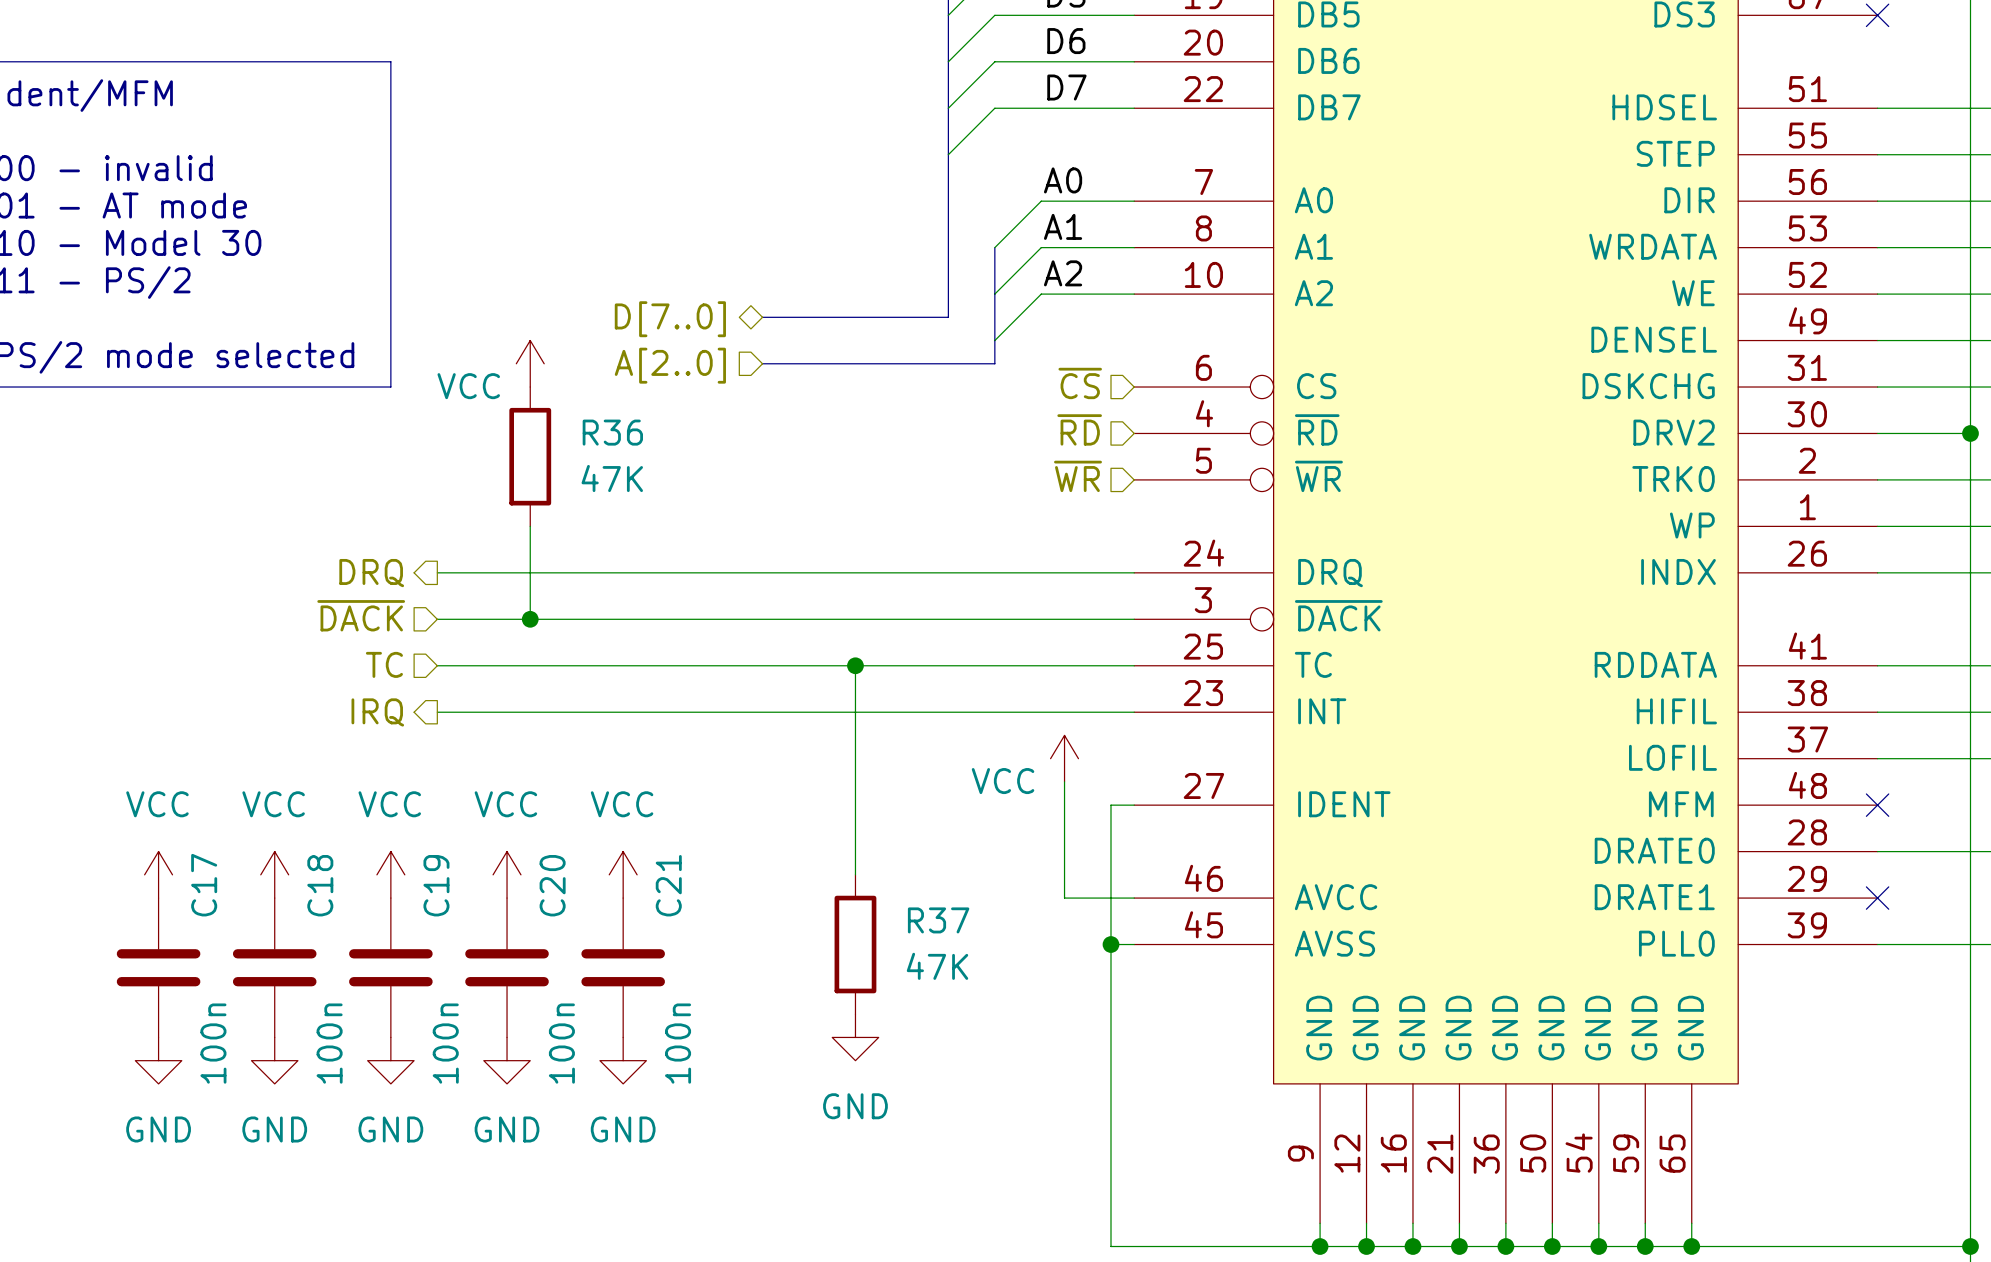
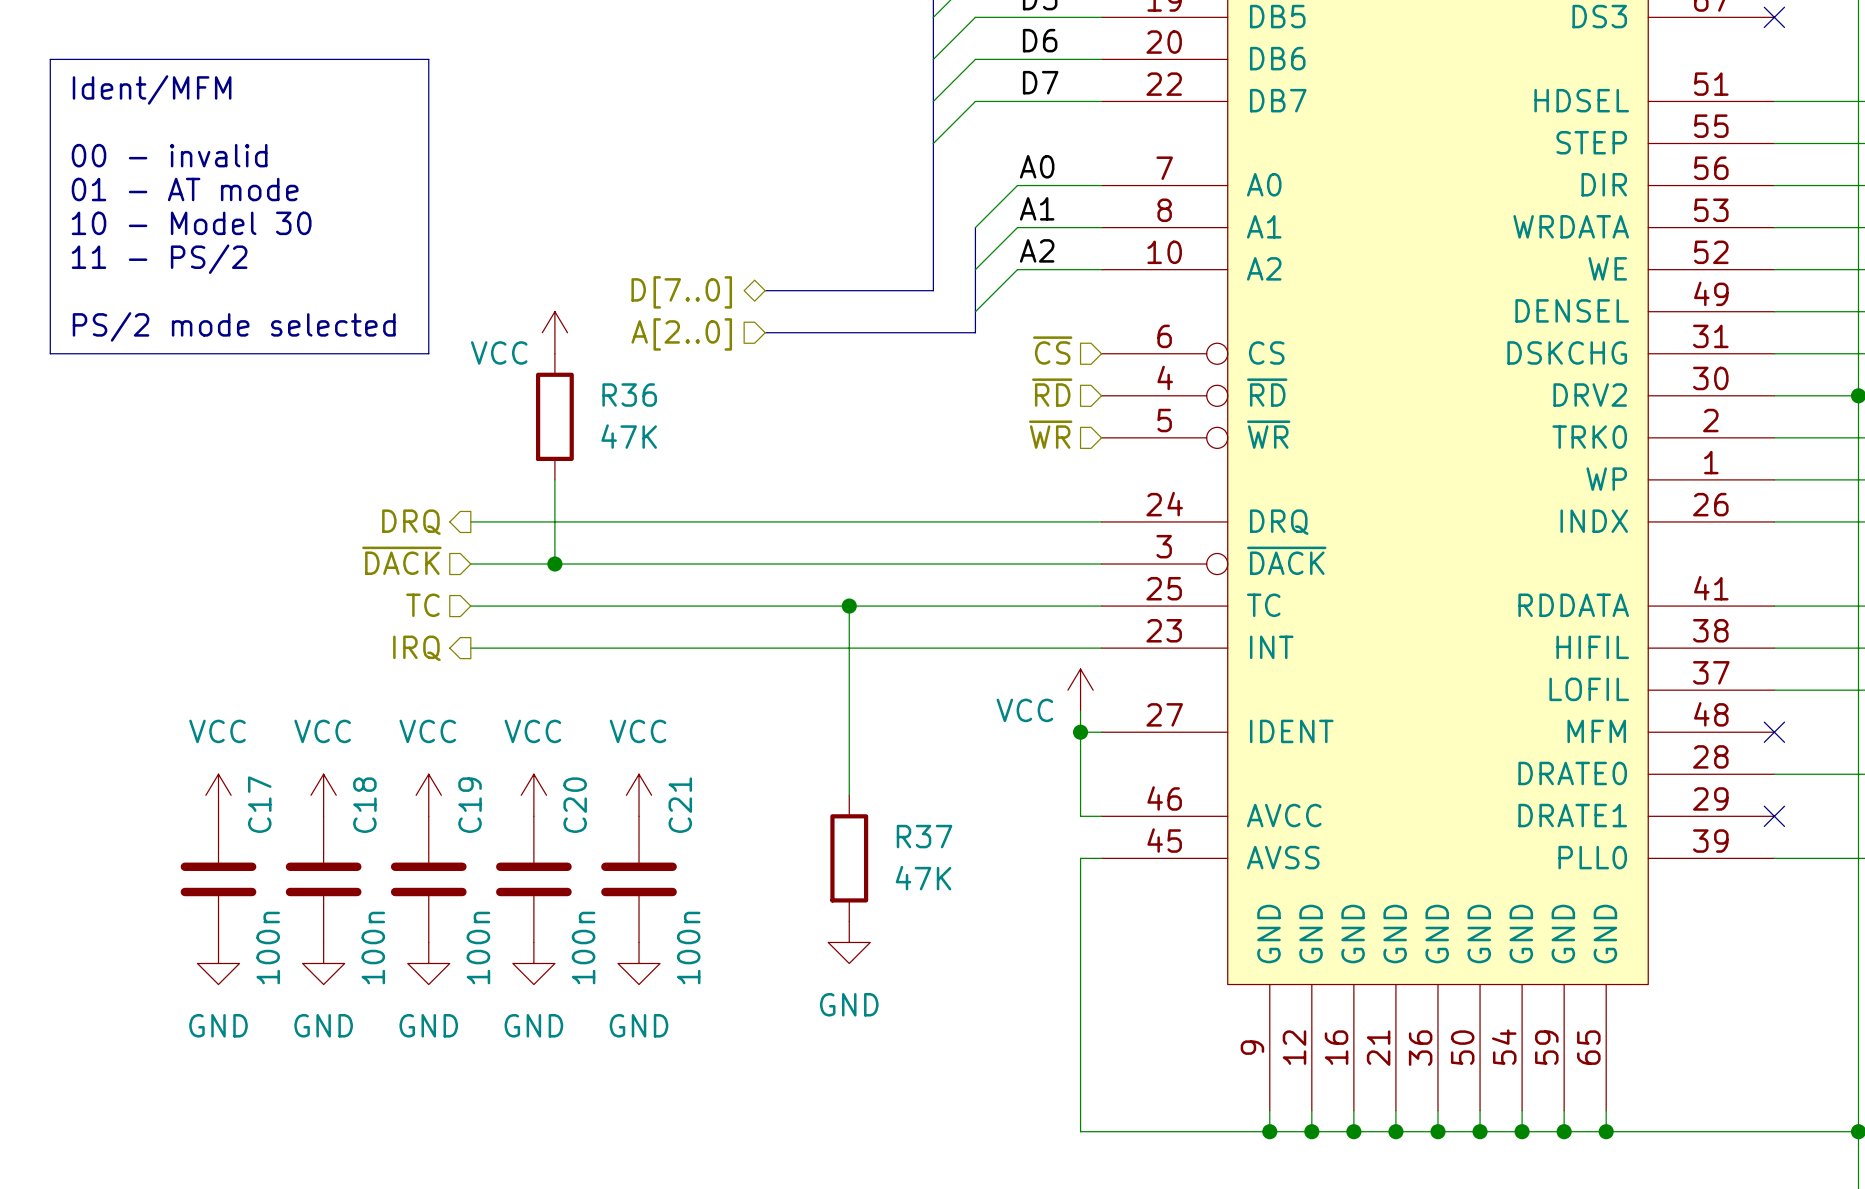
power symbol position: VCC (1064, 758) -> VCC (1080, 690)
wire: (1064, 781) (1064, 898) (1110, 898) (1110, 944) -> none
wire: none -> (1080, 711) (1080, 732)
junction: none -> (1080, 732)
junction: (1110, 944) -> none

